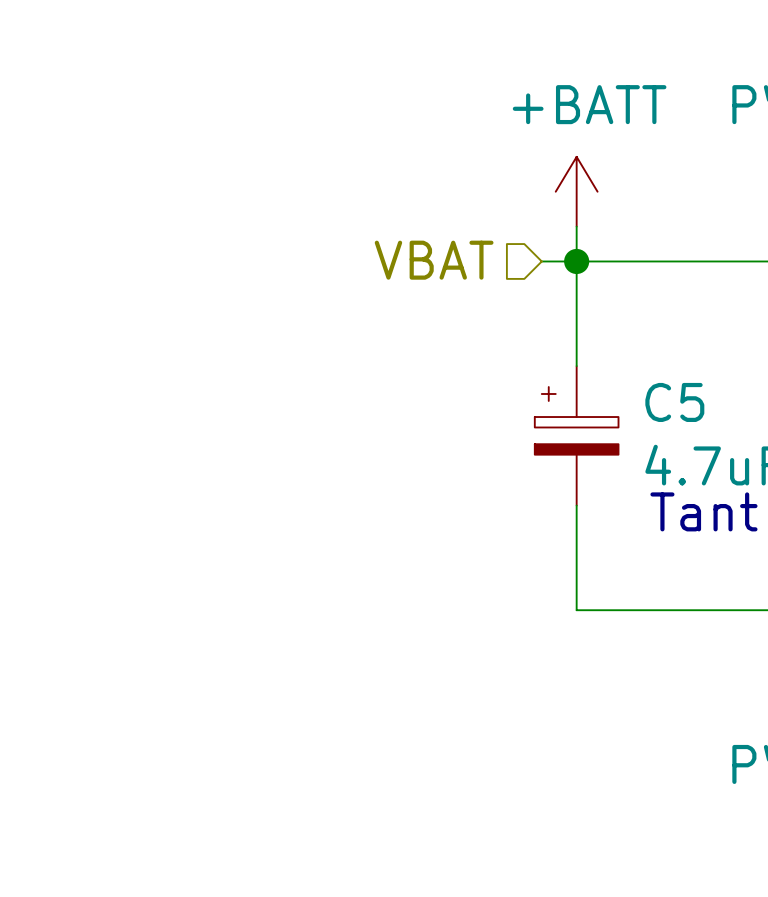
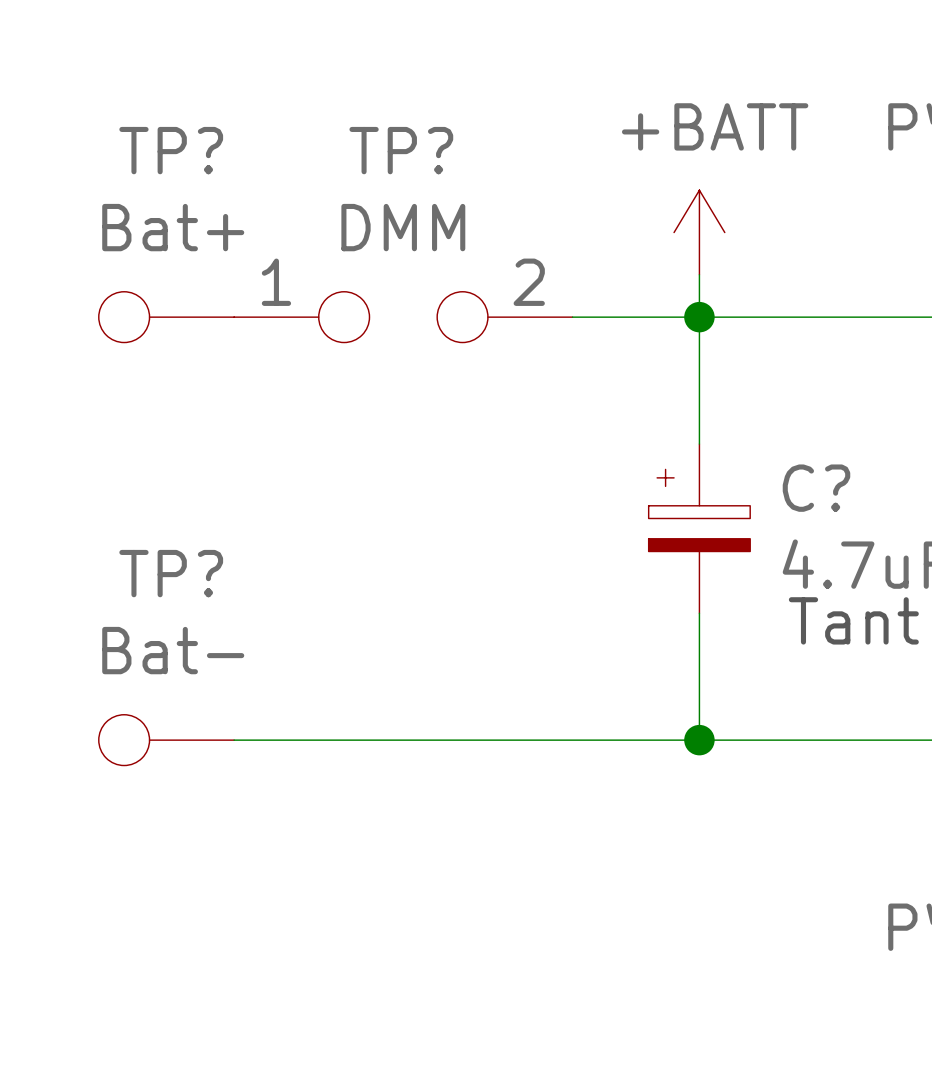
hierarchical label: VBAT (434, 260) -> none
TP?: none -> Bat+ (166, 317)
TP?: none -> (403, 317)
wire: none -> (572, 317) (657, 317)
C5 name: C5 (674, 402) -> C? (816, 488)
TP?: none -> Bat- (166, 740)
wire: none -> (234, 740) (699, 740)
junction: none -> (699, 740)

